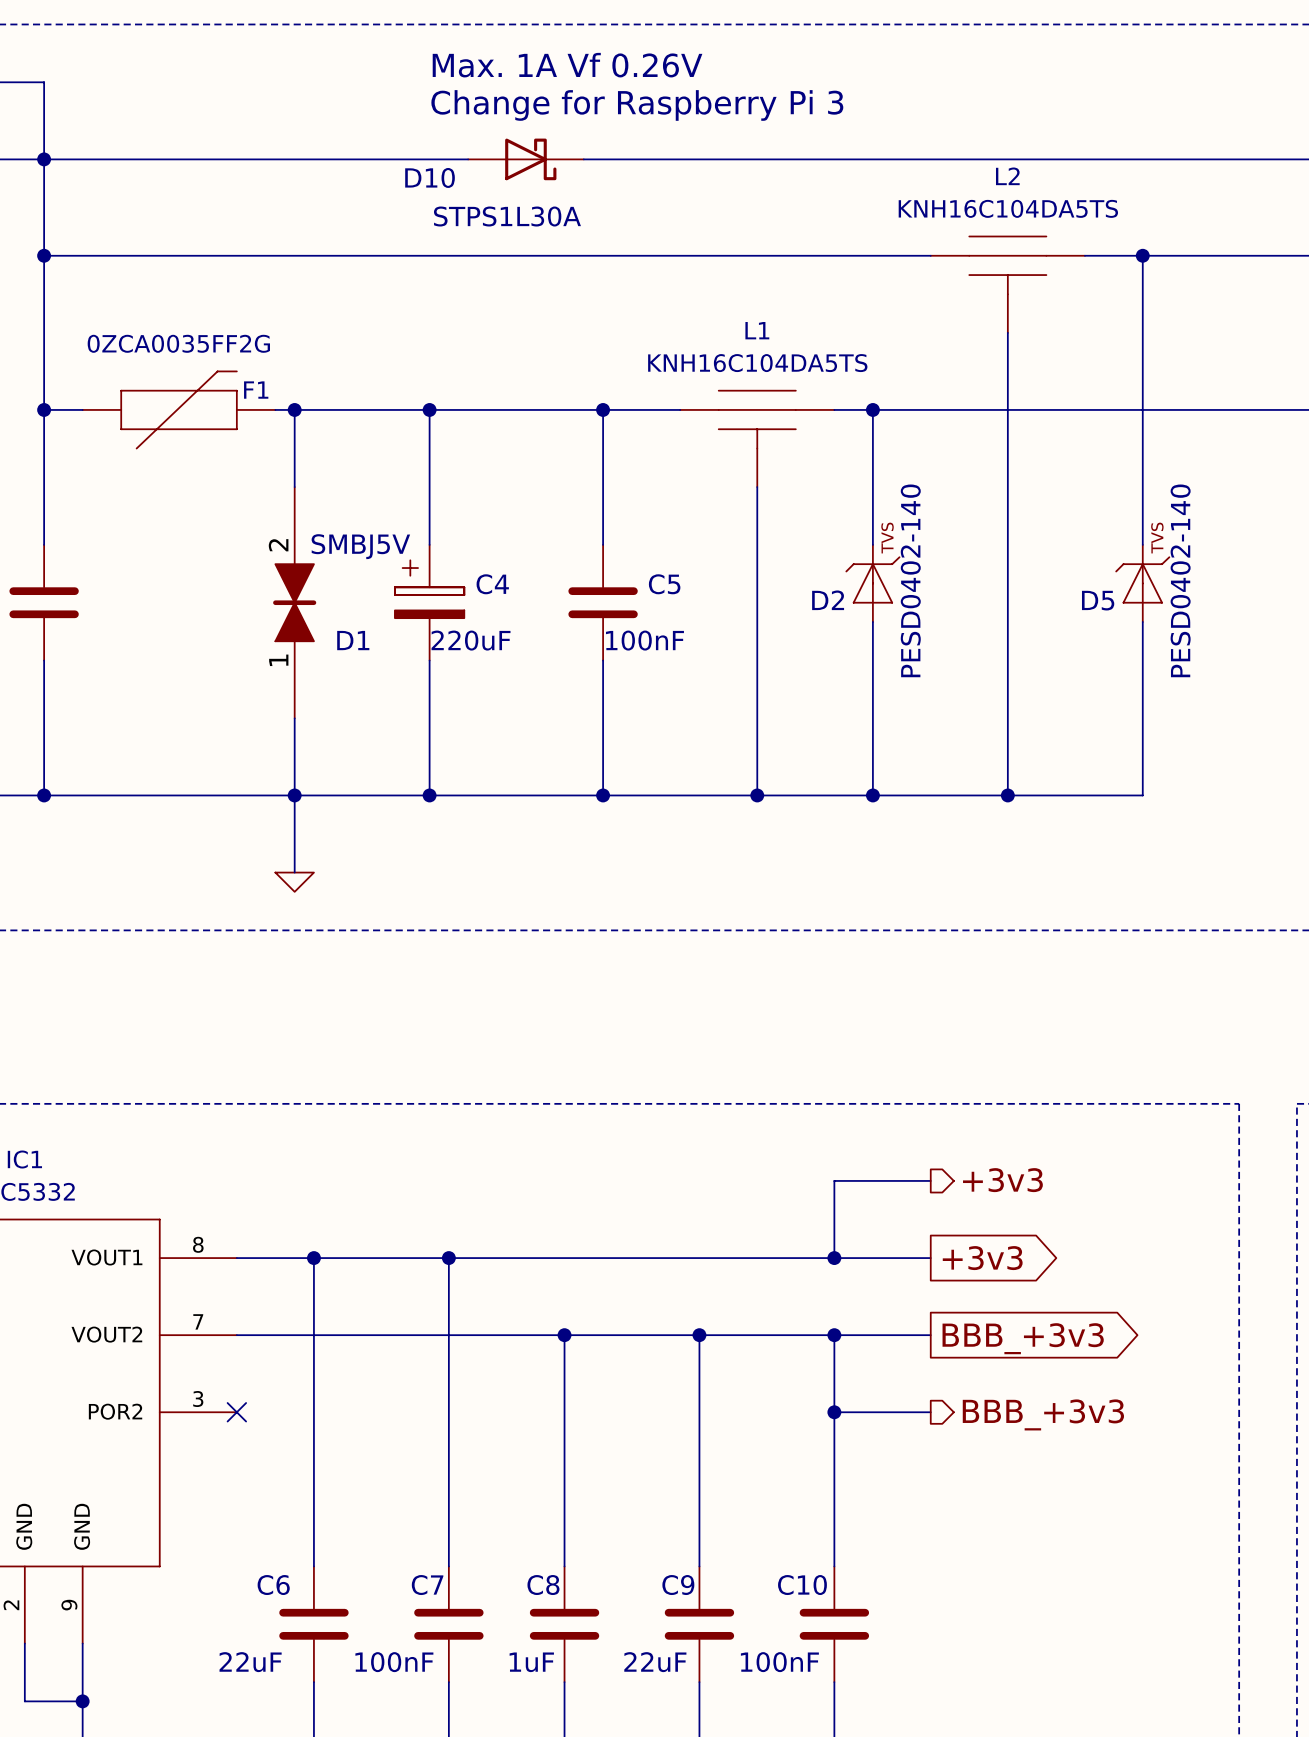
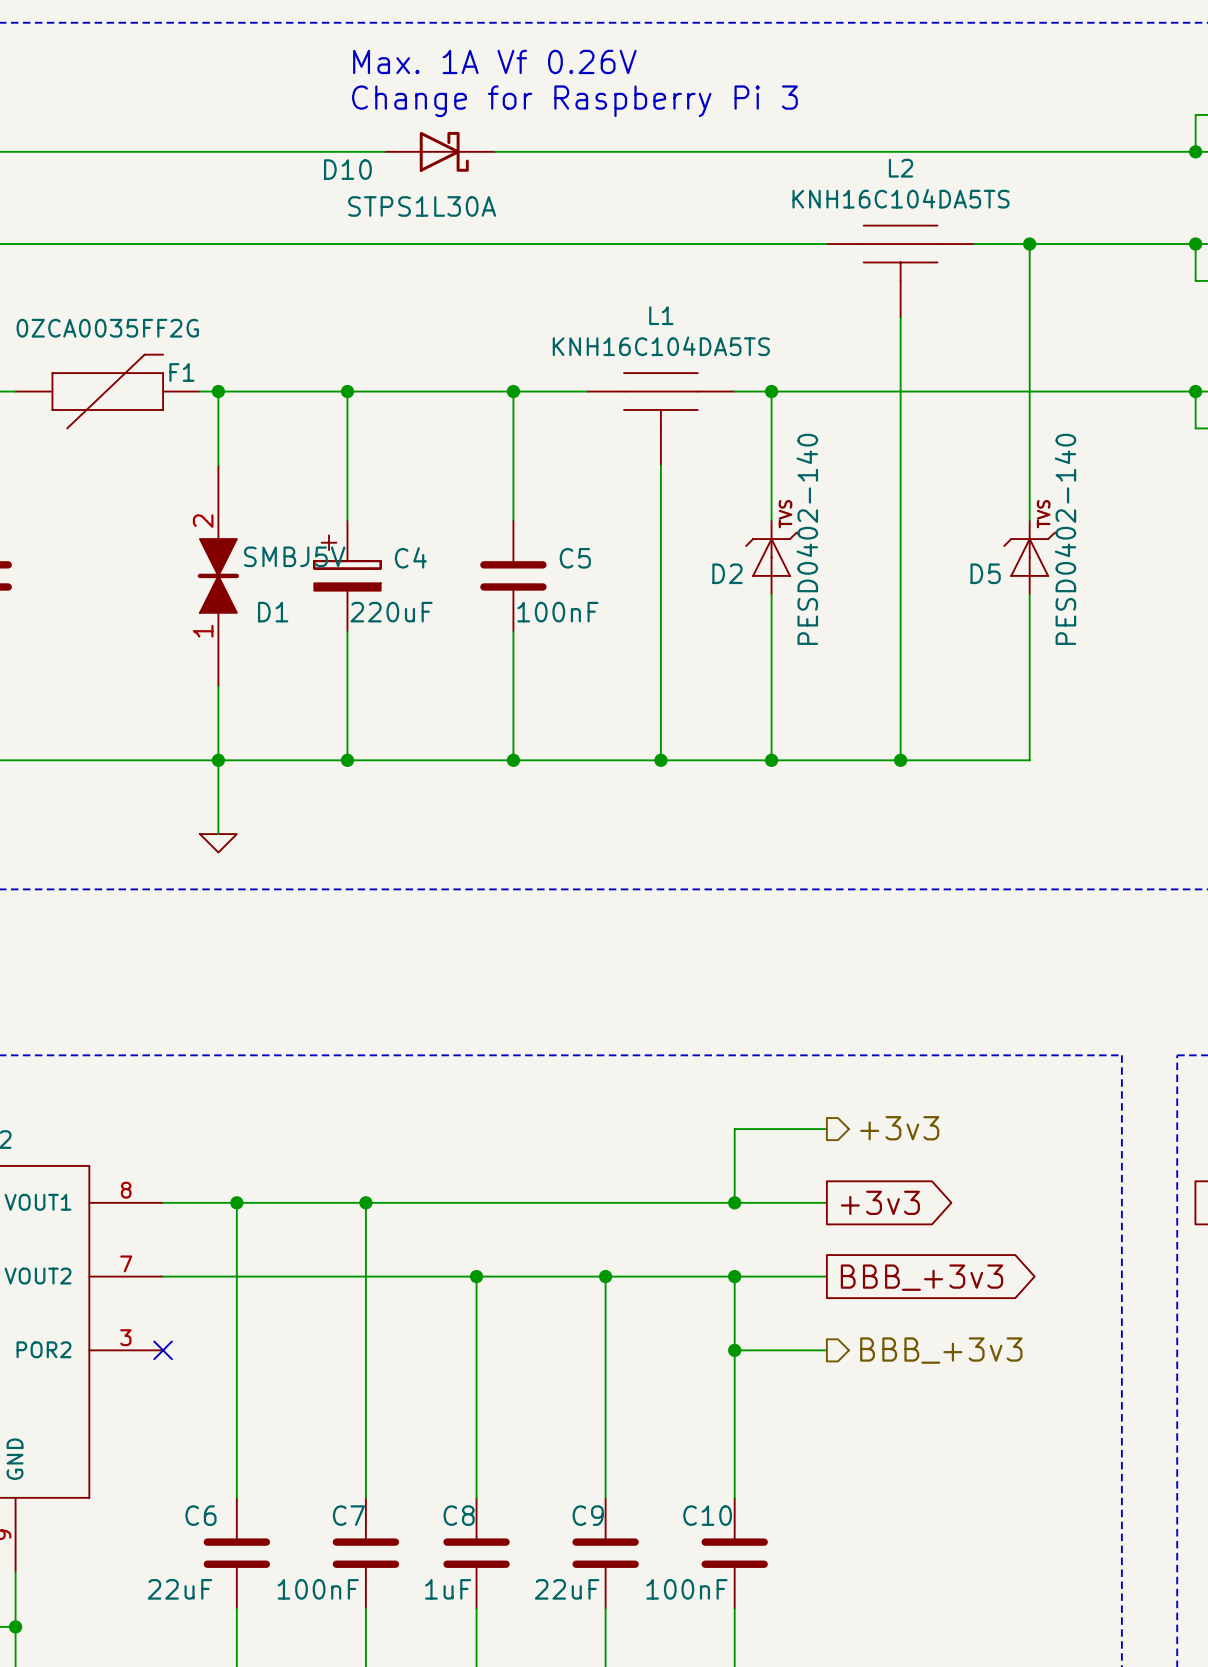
D1 value position: SMBJ5V (360, 546) -> SMBJ5V (294, 556)

